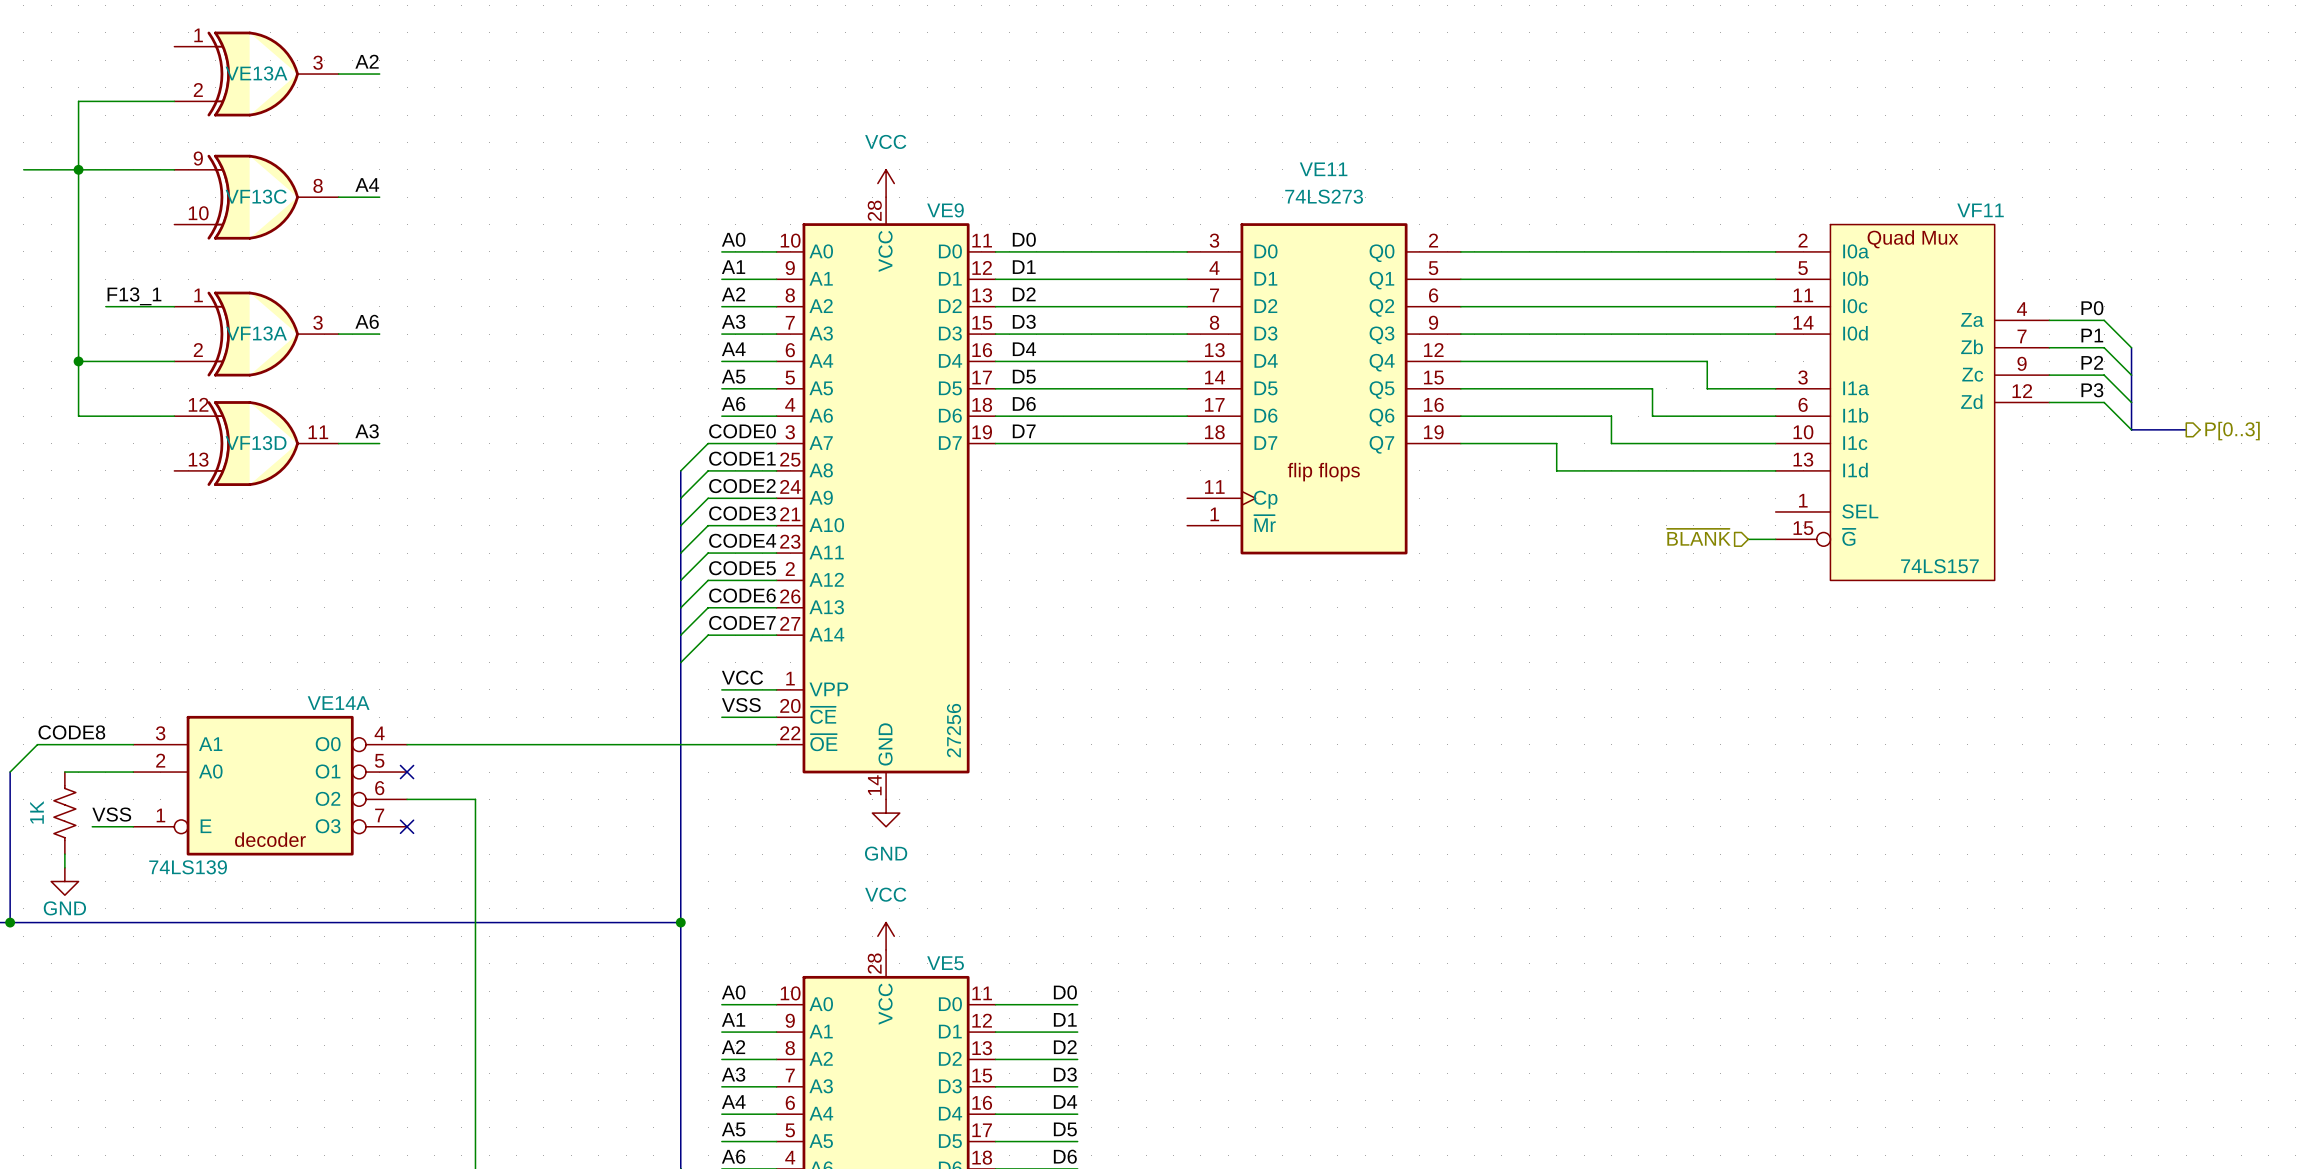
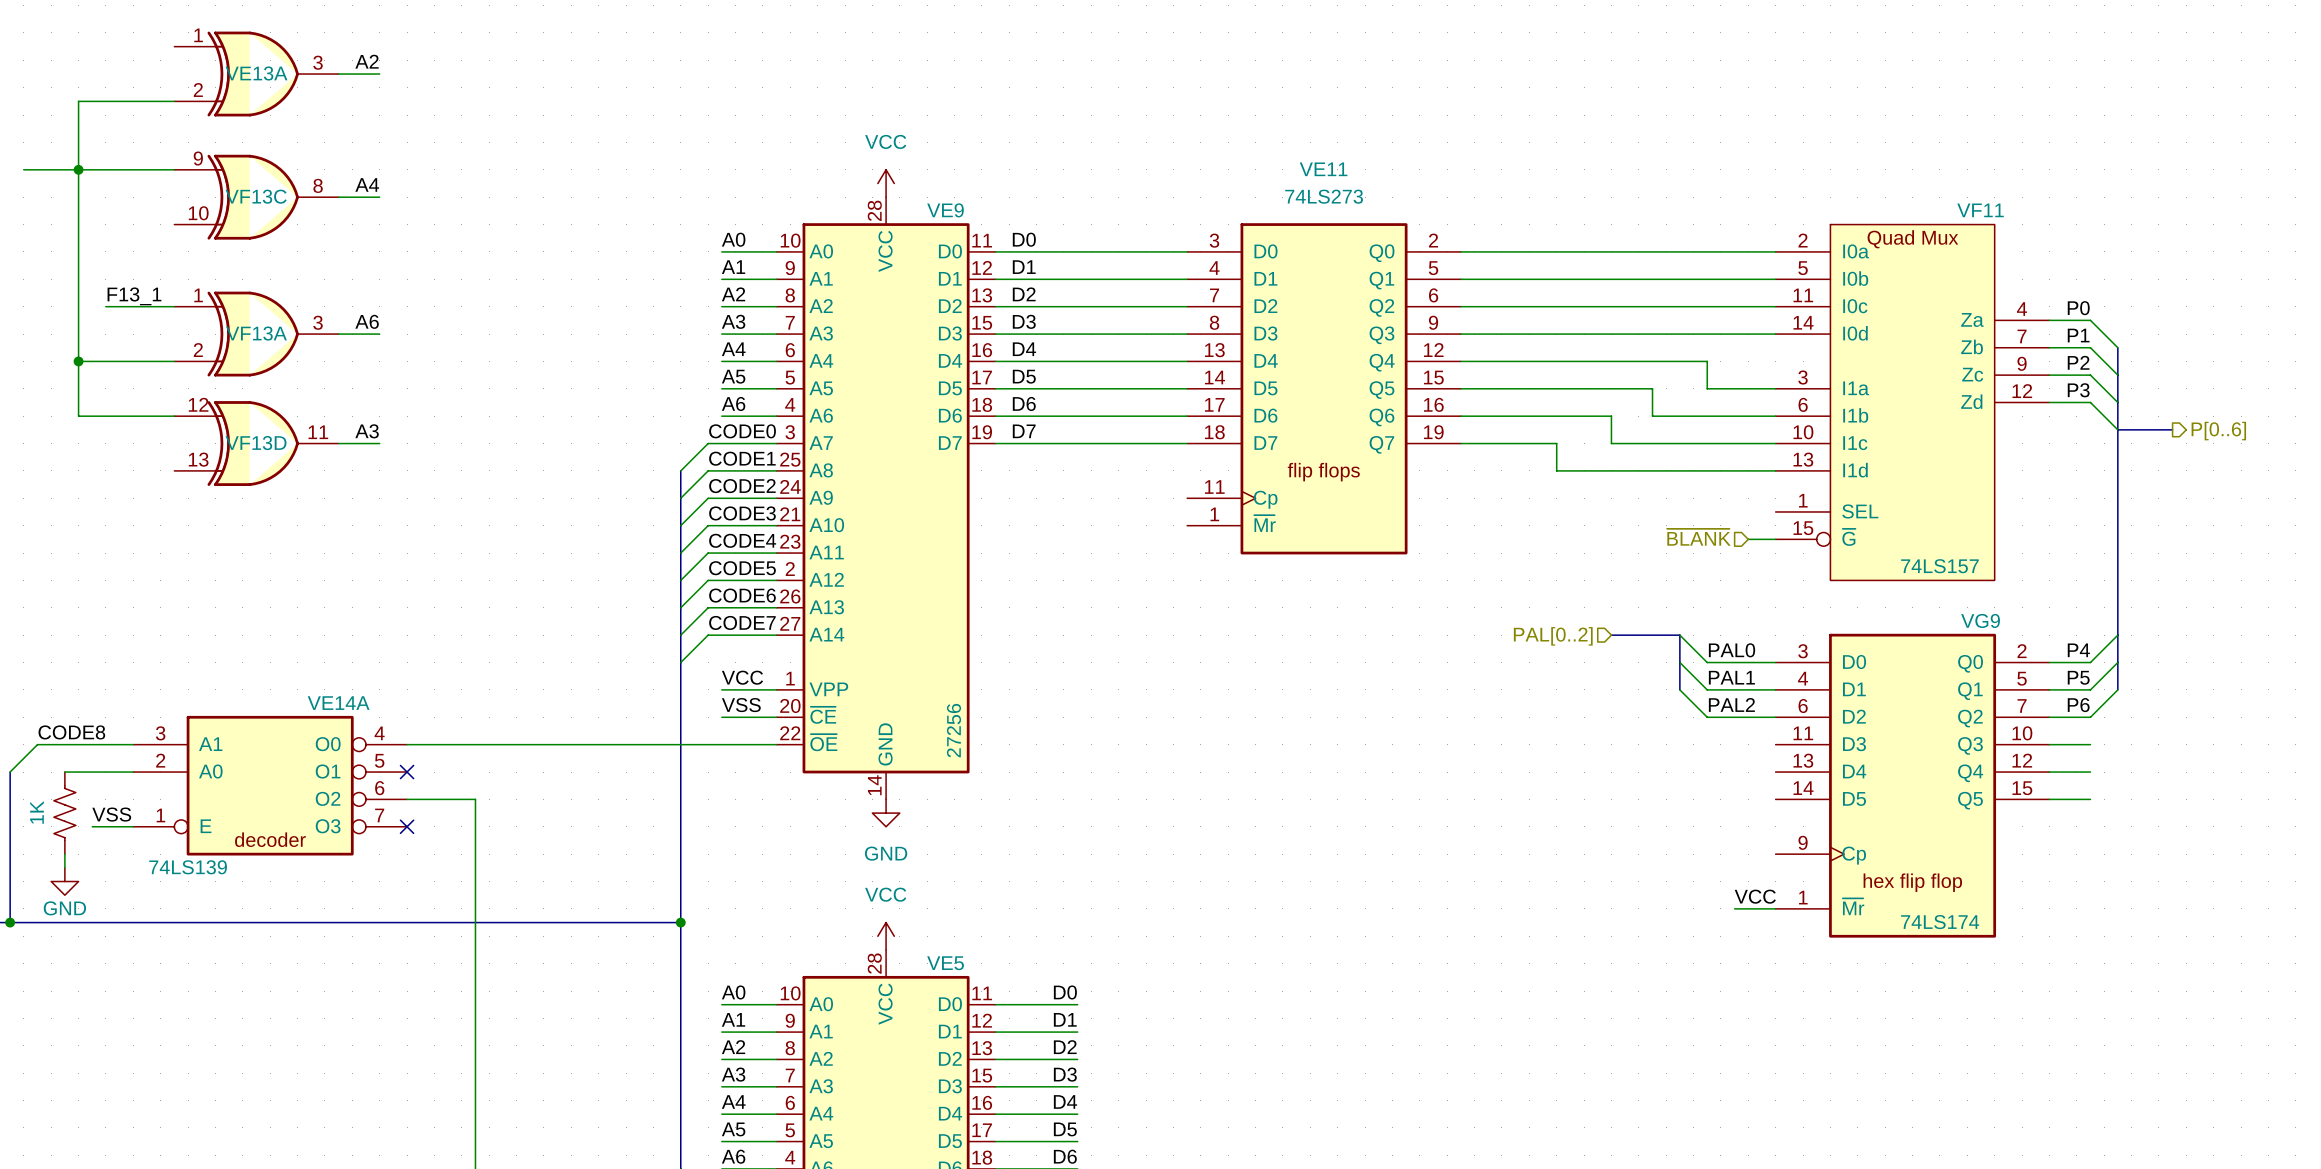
label position: P0 (2092, 308) -> P0 (2078, 308)
wire: (2090, 320) (2104, 320) (2131, 347) -> (2090, 320) (2117, 347)
label position: P1 (2092, 335) -> P1 (2078, 335)
wire: (2090, 347) (2104, 347) (2131, 375) -> (2090, 347) (2117, 375)
bus: none -> (2117, 347) (2117, 689)
bus: (2131, 347) (2131, 429) -> (2117, 429) (2131, 429)
label position: P2 (2092, 362) -> P2 (2078, 362)
wire: (2090, 375) (2104, 375) (2131, 402) -> (2090, 375) (2117, 402)
label position: P3 (2092, 390) -> P3 (2078, 390)
wire: (2090, 402) (2104, 402) (2131, 429) -> (2090, 402) (2117, 429)
bus: (2172, 429) (2186, 429) -> none
hierarchical label: P[0..3] (2232, 431) -> P[0..6] (2218, 431)
bus: none -> (1611, 635) (1679, 635) (1679, 689)
wire: none -> (1679, 635) (1707, 662) (1775, 662)
wire: none -> (2117, 635) (2090, 662) (2049, 662)
hierarchical label: none -> PAL[0..2] (1553, 636)
label: none -> PAL0 (1732, 650)
label: none -> P4 (2078, 650)
wire: none -> (1679, 662) (1707, 689) (1775, 689)
wire: none -> (2117, 662) (2090, 689) (2049, 689)
label: none -> PAL1 (1731, 677)
label: none -> P5 (2078, 677)
wire: none -> (1679, 689) (1707, 717) (1775, 717)
wire: none -> (2117, 689) (2090, 717) (2049, 717)
label: none -> PAL2 (1731, 704)
label: none -> P6 (2078, 705)
wire: none -> (2049, 744) (2090, 744)
wire: none -> (2049, 772) (2090, 772)
VG9: none -> 74LS174 (1912, 785)
wire: none -> (2049, 799) (2090, 799)
label: none -> VCC (1755, 896)
wire: none -> (1734, 908) (1775, 908)

